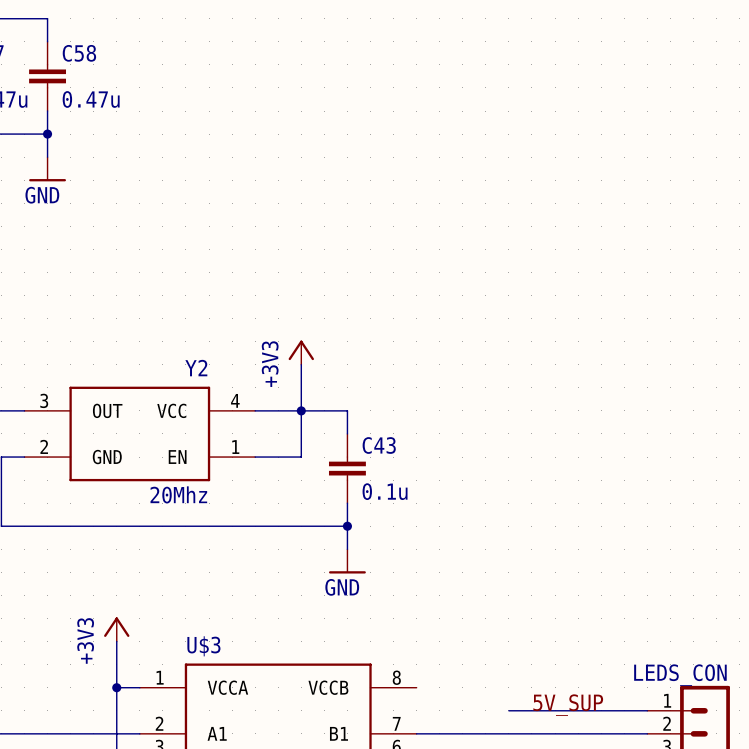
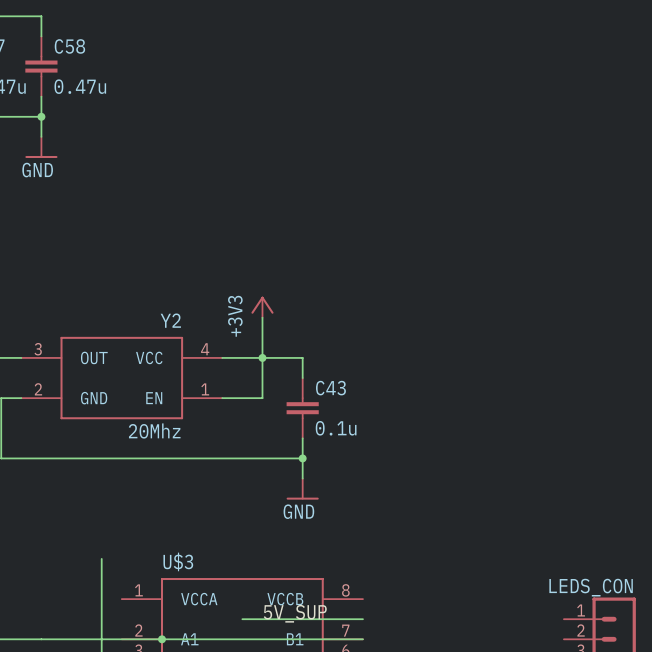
power symbol: +3V3 (116, 629) -> none
wire: (116, 687) (139, 687) -> none
junction: (116, 687) -> none
label: none -> 5V_SUP (295, 613)
label: 5V_SUP (568, 705) -> none
wire: none -> (242, 619) (362, 619)
wire: (508, 710) (647, 710) -> none
junction: none -> (162, 639)
wire: (416, 733) (647, 733) -> (362, 639) (121, 639)

